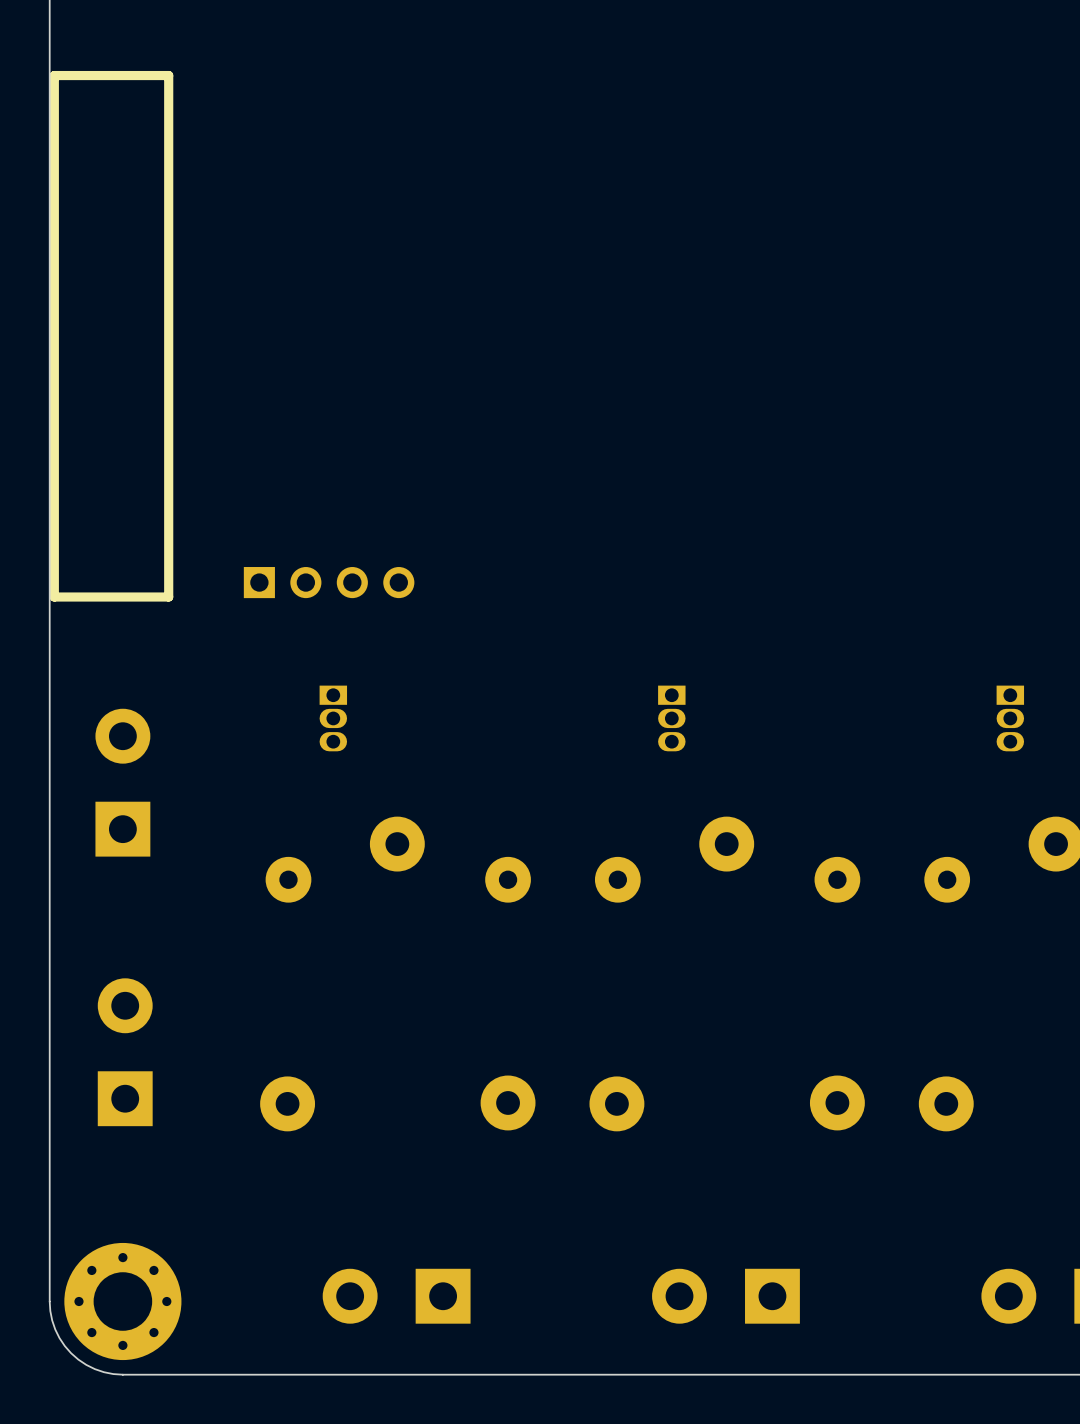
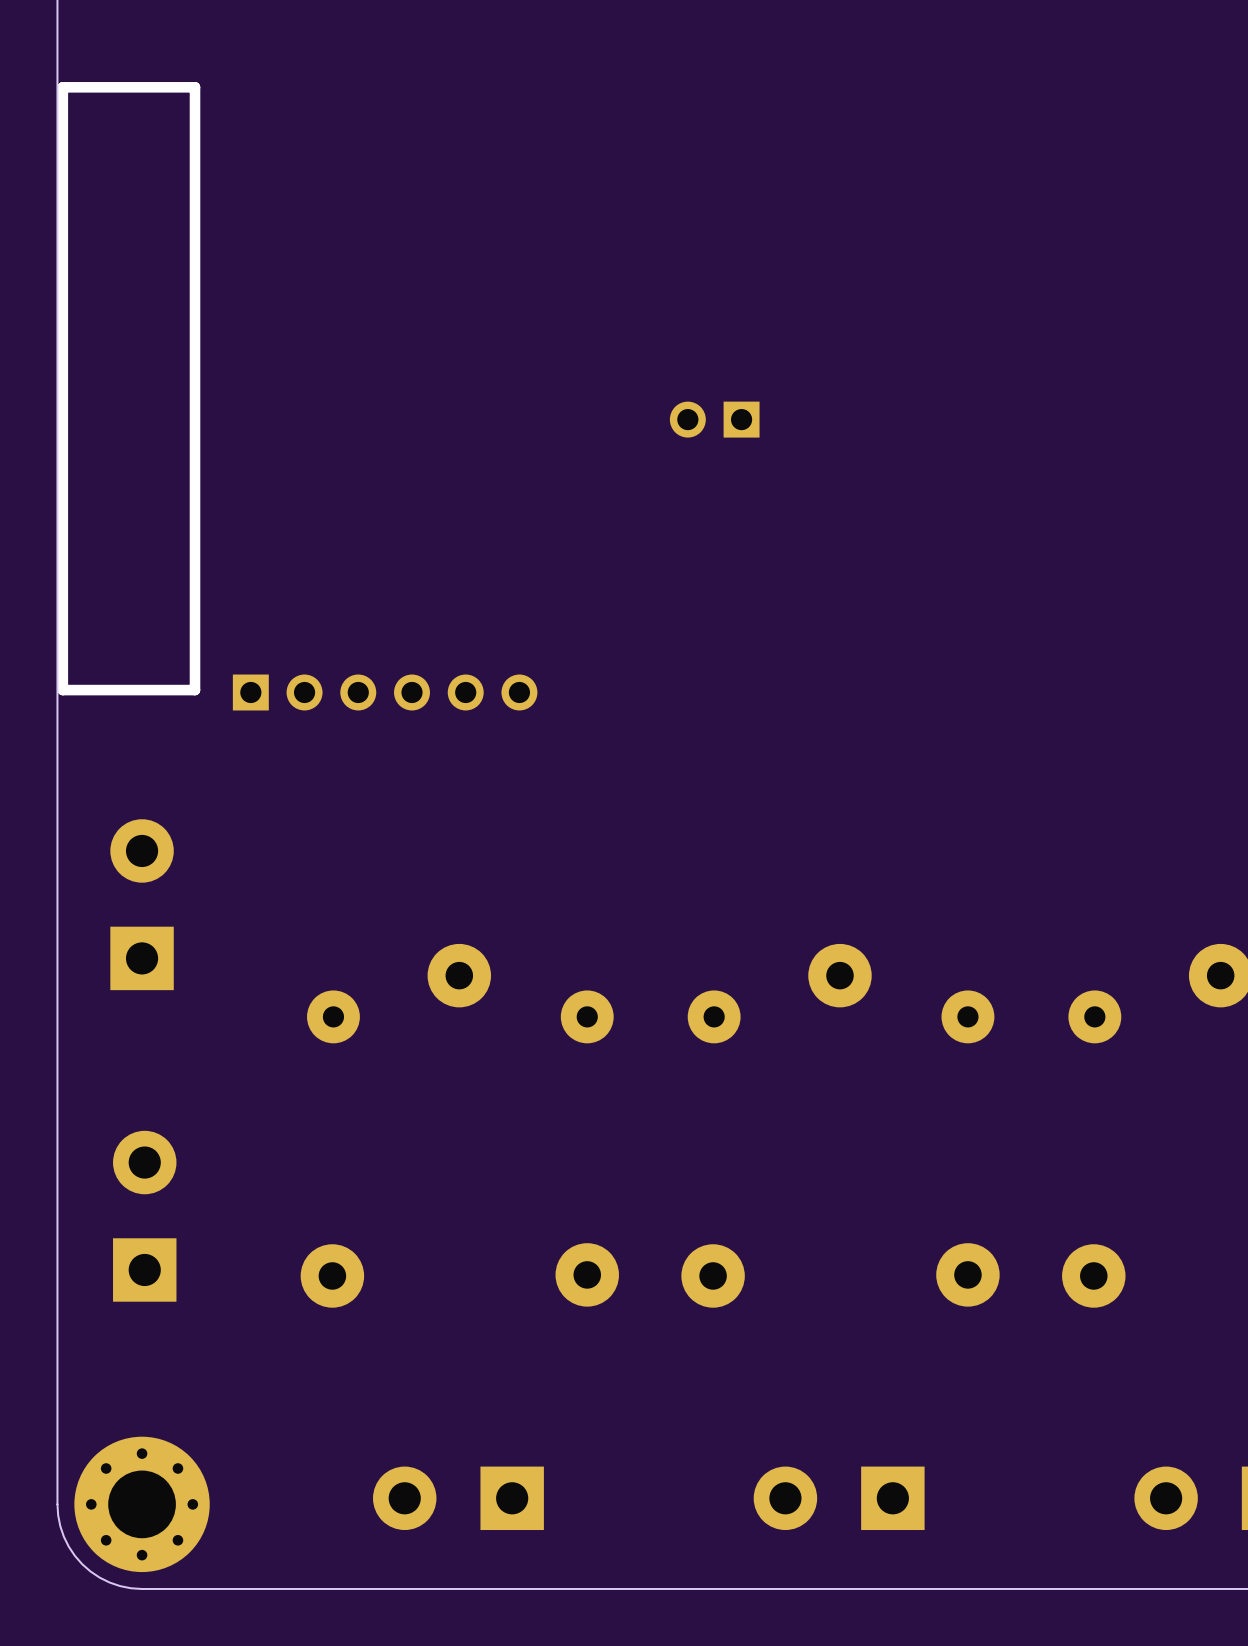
part: none -> (714, 419)
part footprint: [243, 567, 415, 599] -> [232, 674, 538, 711]
part: (333, 718) -> none
part: (671, 718) -> none
part: (1010, 718) -> none

